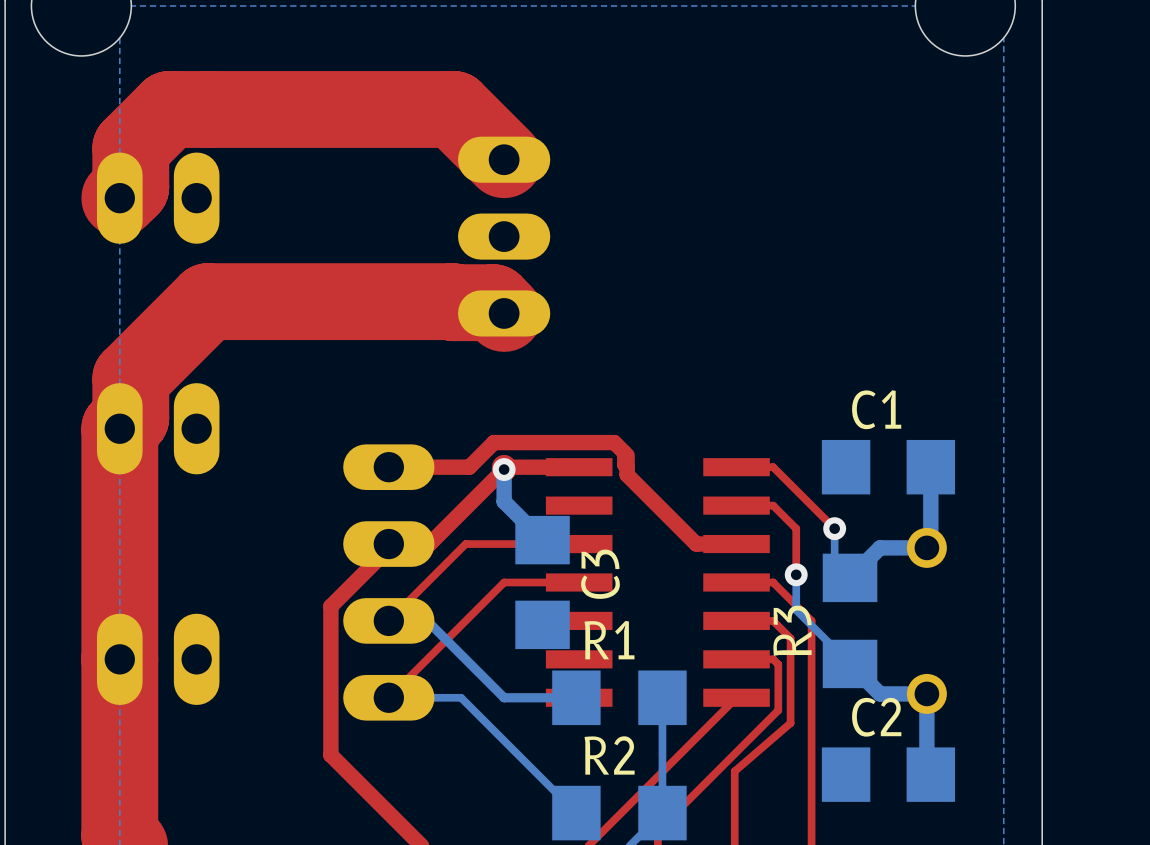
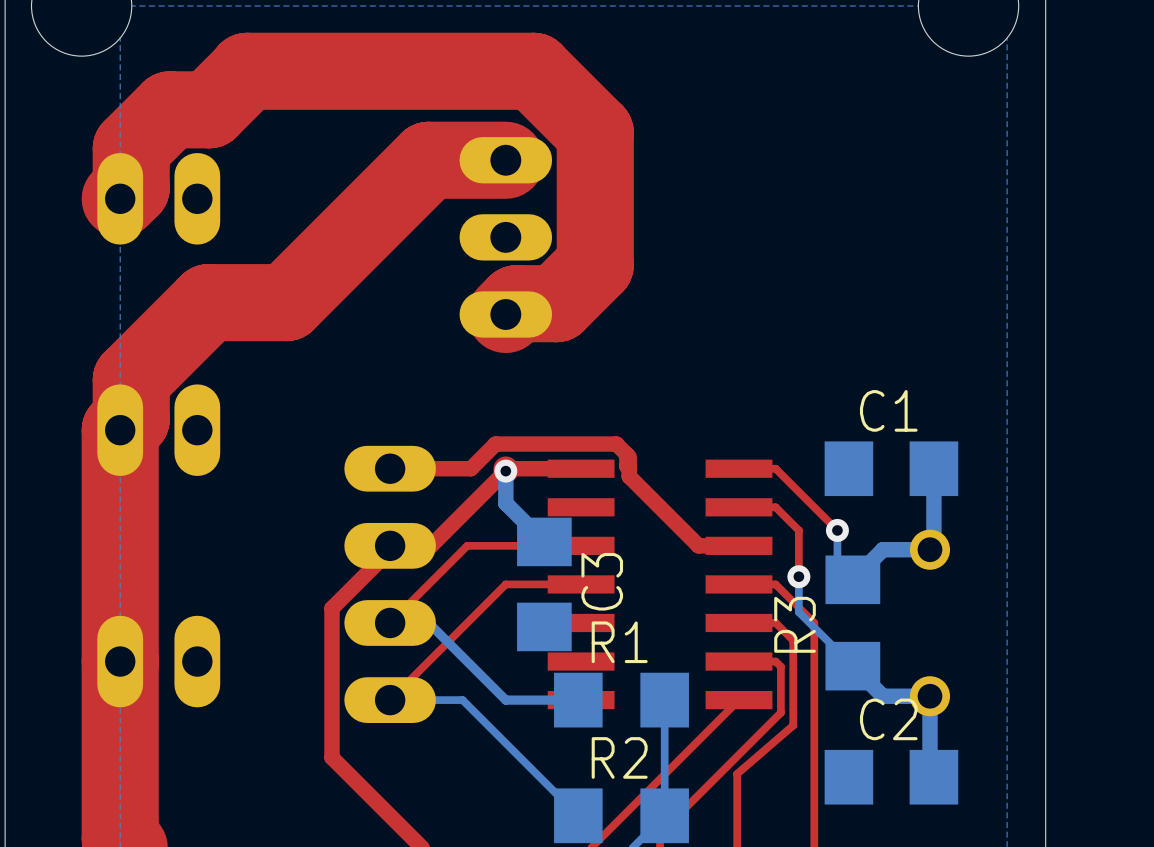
top track: (208, 109) (453, 109) (504, 159) -> (209, 109) (247, 71) (533, 71) (595, 132) (595, 264) (556, 303) (516, 303) (505, 314)
top track: (285, 301) (493, 302) (504, 313) -> (286, 302) (428, 160) (505, 160)

